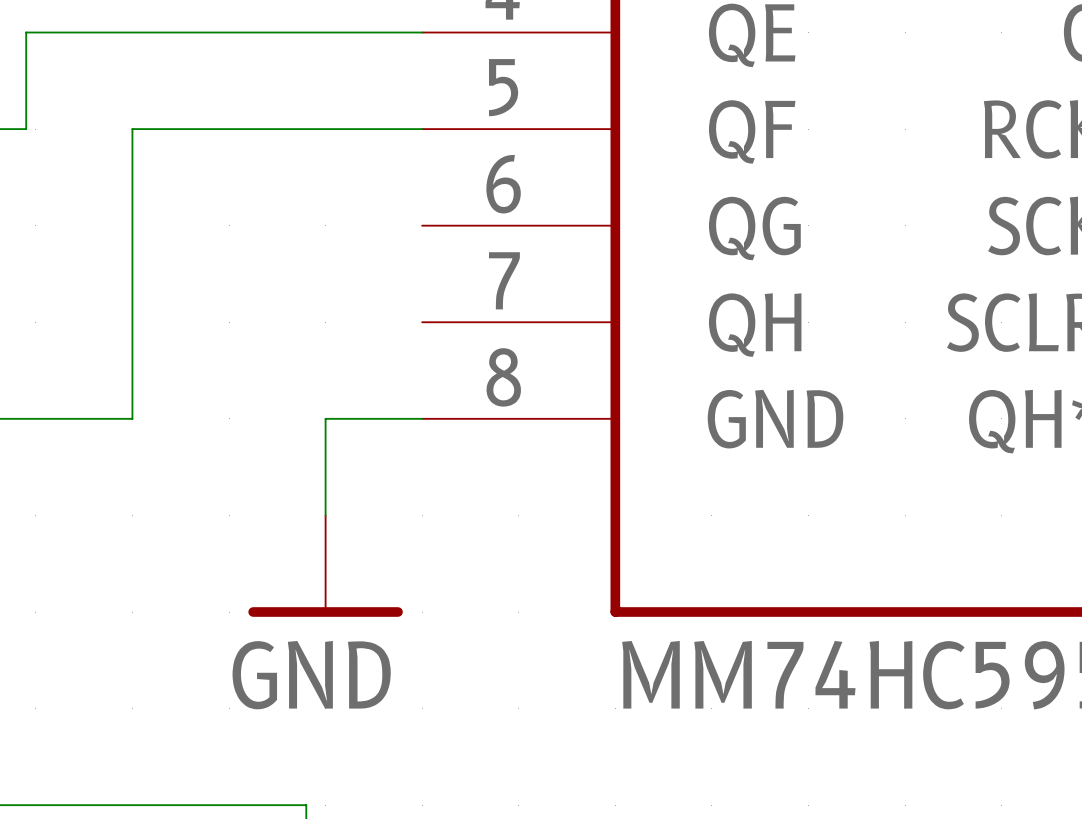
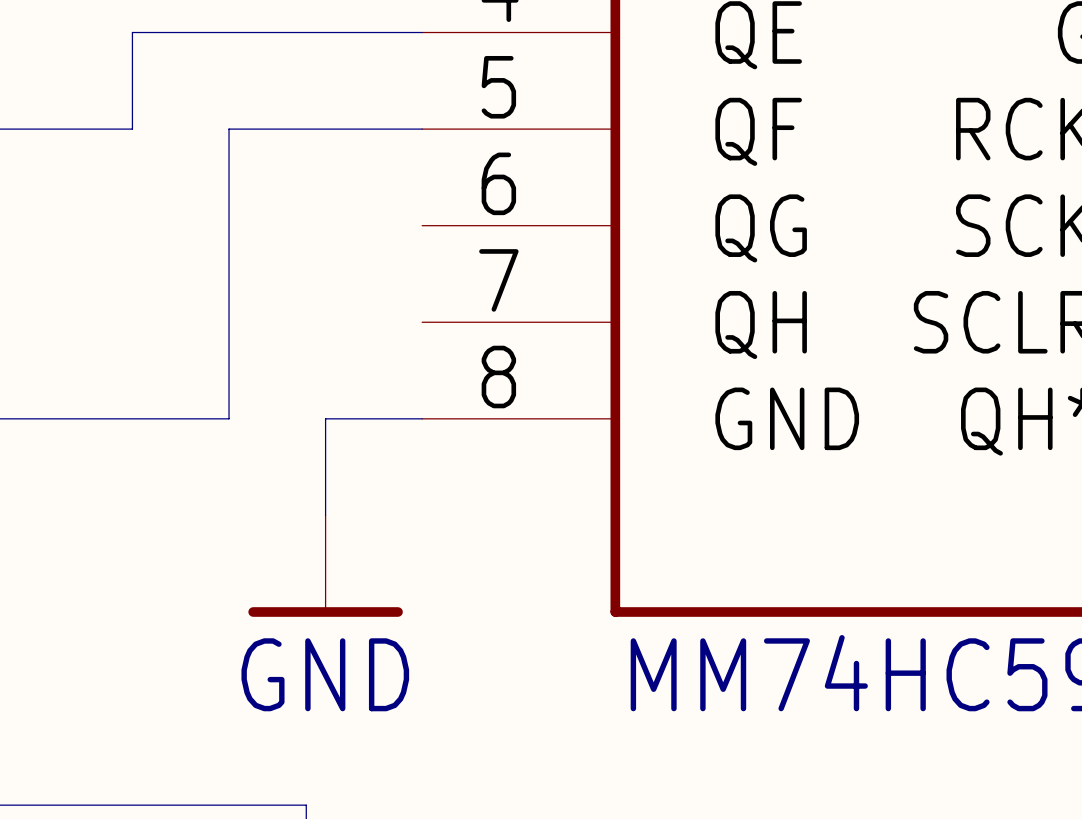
wire: (132, 32) (26, 32) (26, 129) -> (132, 32) (132, 129) (26, 129)
wire: (229, 129) (132, 129) (132, 418) -> (229, 129) (229, 418) (132, 418)

